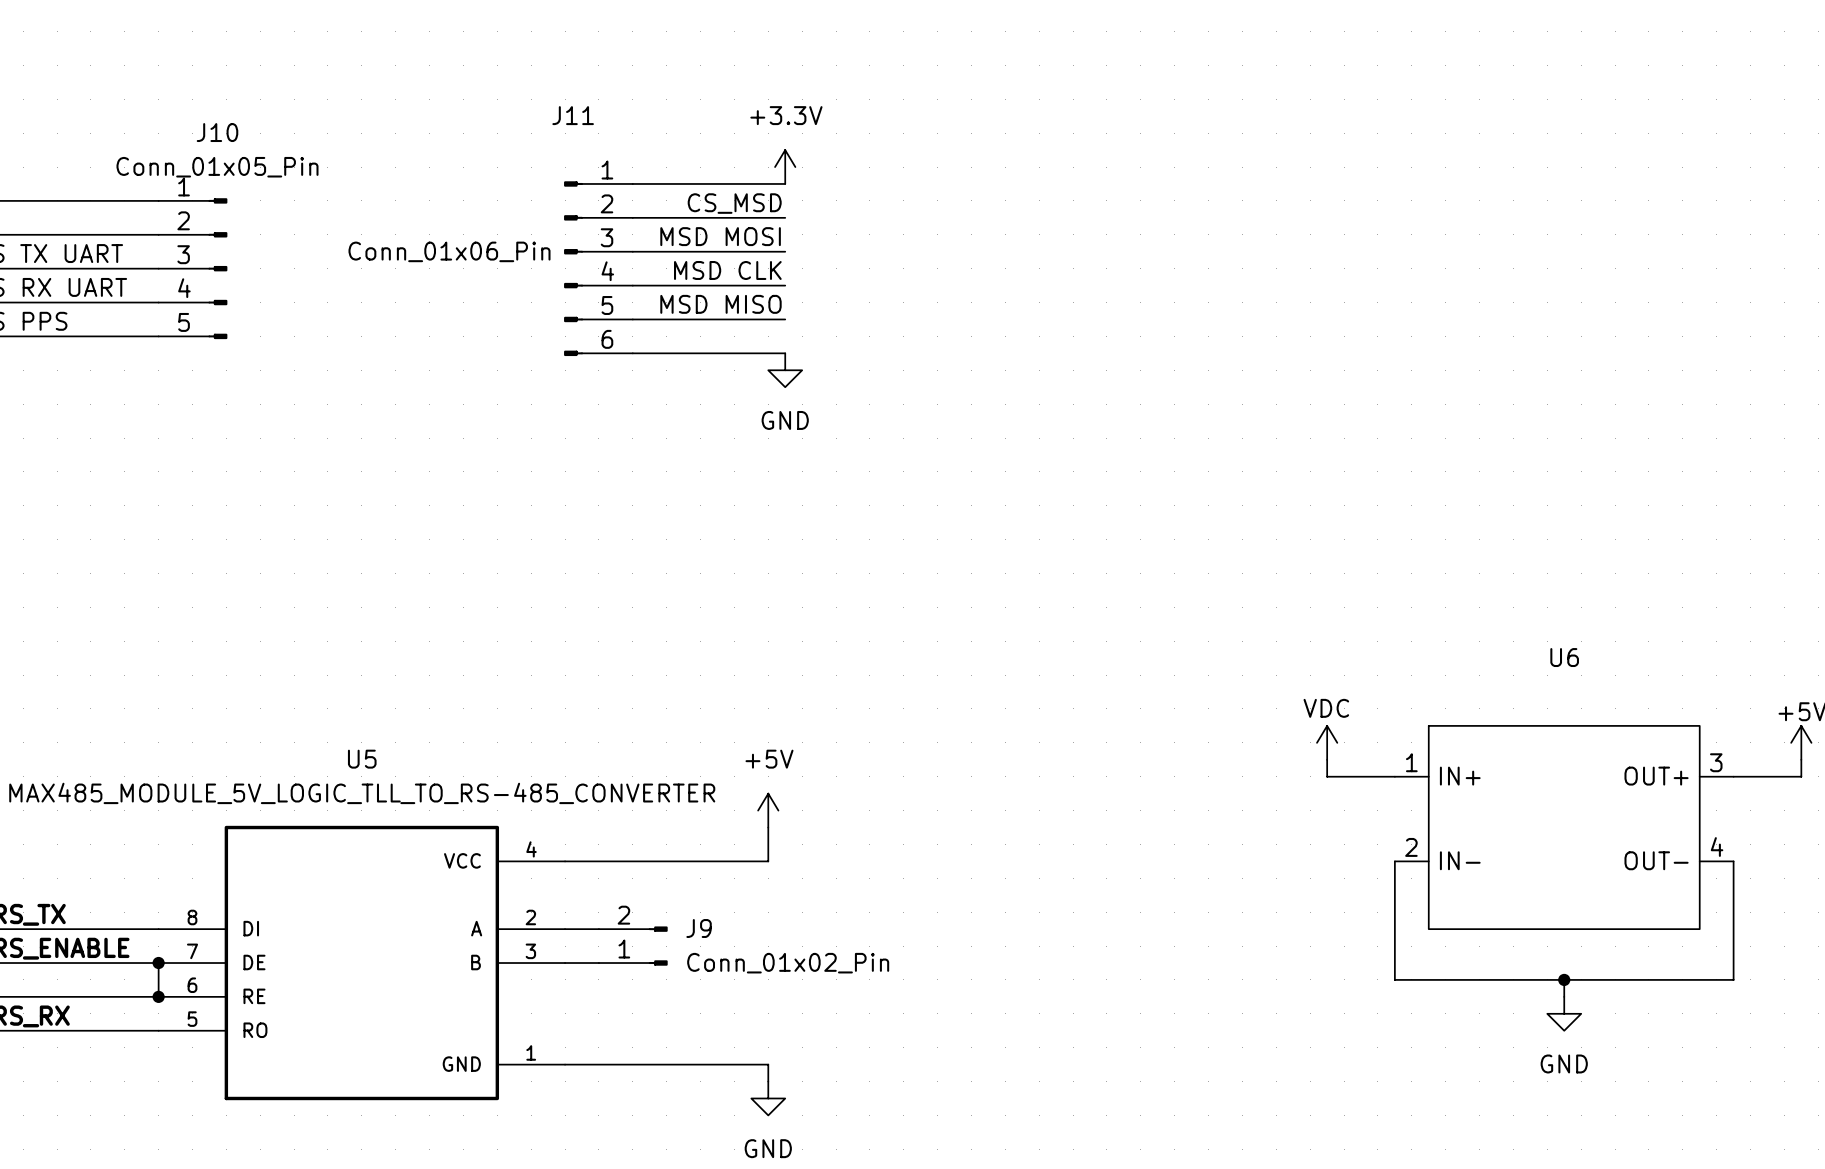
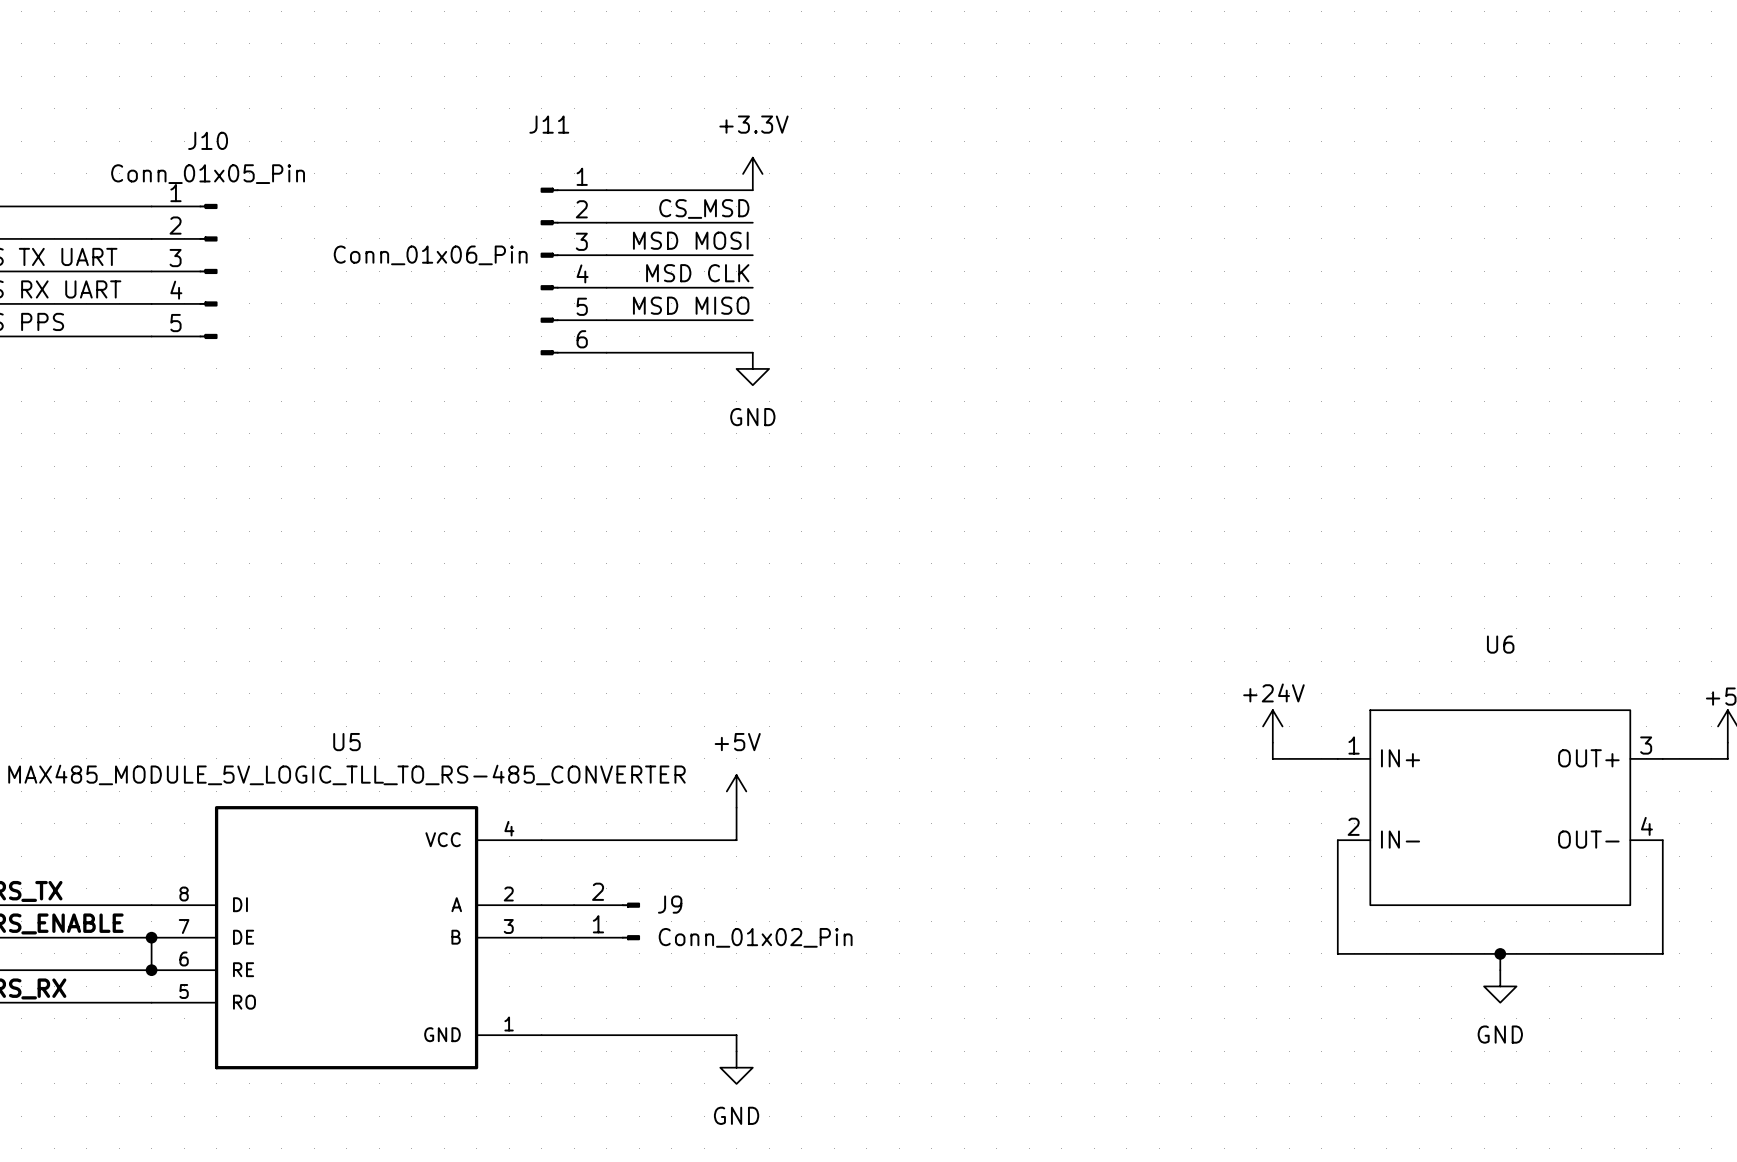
power symbol: VDC (1327, 742) -> +24V (1272, 726)

